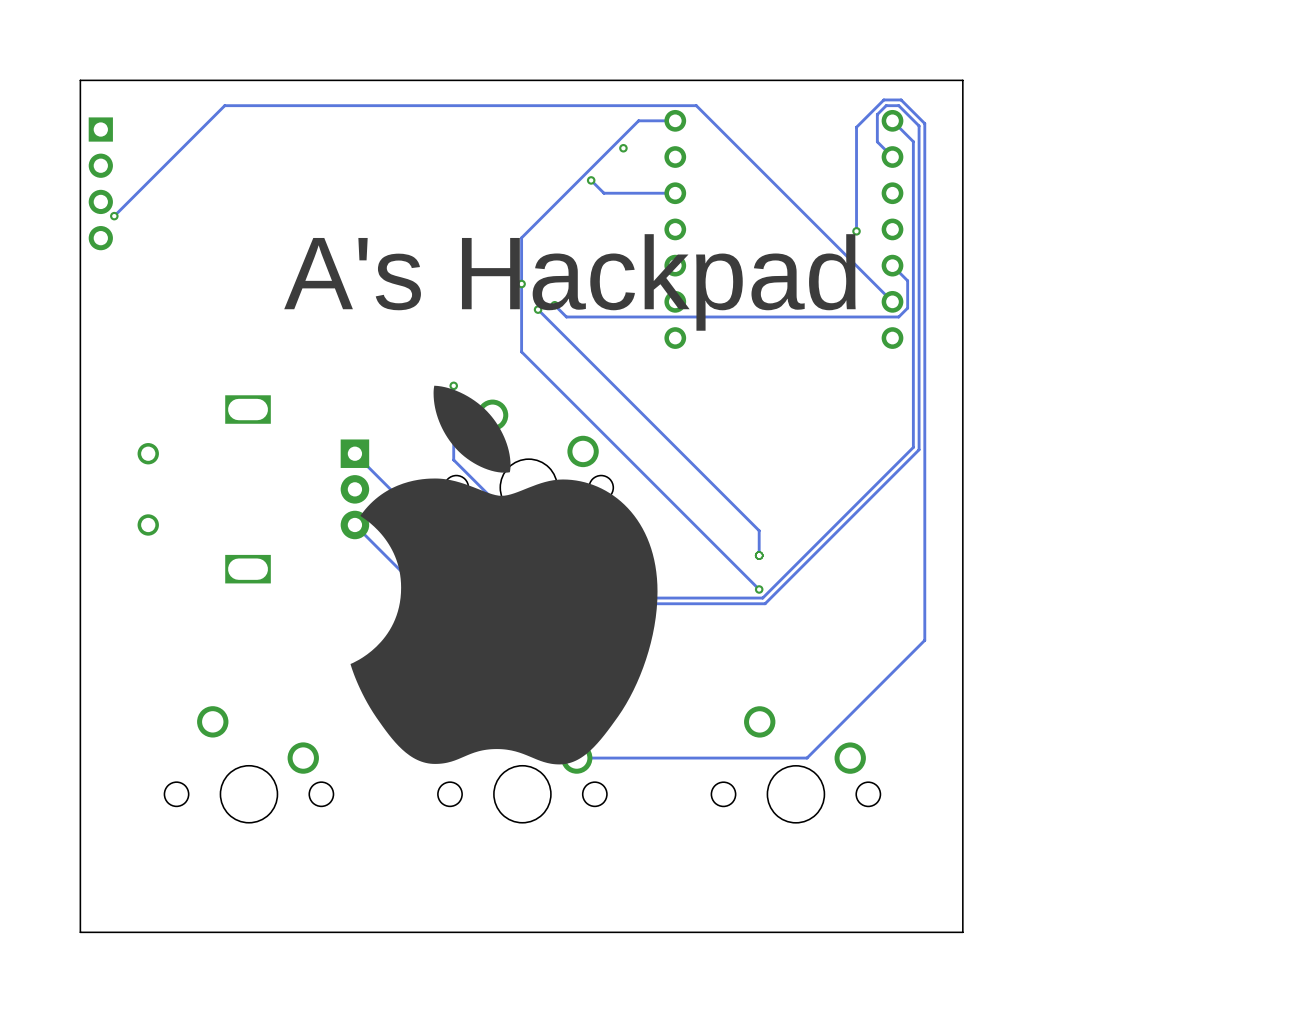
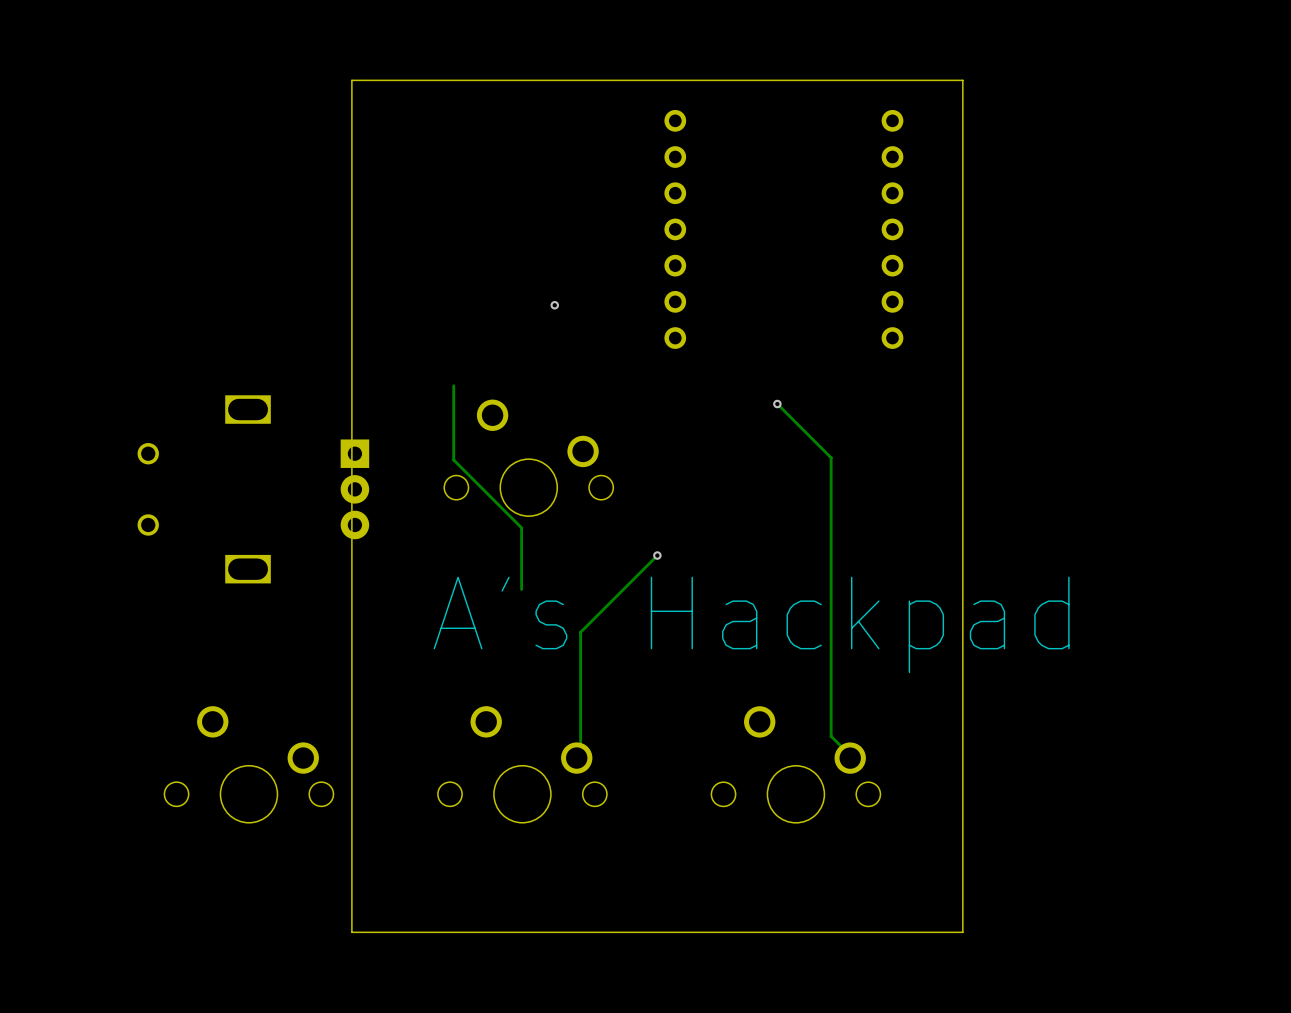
board edge: (351, 80) (80, 80) (80, 932) (351, 932) -> (351, 80) (351, 932)
track: (675, 120) (638, 120) (521, 237) (521, 351) (759, 589) -> none
track: (892, 120) (913, 141) (913, 447) (762, 598) (499, 598) (354, 453) -> none
via: (623, 148) -> none
track: (892, 157) (877, 141) (877, 114) (886, 105) (898, 105) (919, 125) (919, 449) (765, 603) (433, 603) (354, 524) -> none
track: (591, 180) (603, 193) (675, 193) -> none
via: (591, 180) -> none
part: (100, 183) -> none
track: (114, 216) (224, 105) (696, 105) (892, 301) -> none
via: (114, 216) -> none
track: (856, 230) (856, 127) (883, 99) (901, 99) (924, 123) (924, 640) (807, 758) (576, 758) -> none
via: (856, 231) -> none
track: (892, 265) (907, 280) (907, 308) (898, 316) (566, 316) (554, 305) -> none
text: A's Hackpad (569, 282) -> none
via: (521, 284) -> none
track: (538, 309) (759, 530) (759, 555) -> none
via: (538, 309) -> none
drawing: [350, 385, 658, 765] -> none
via: (453, 385) -> none
track: none -> (777, 404) (831, 457) (831, 736) (852, 757)
via: none -> (777, 404)
track: none -> (657, 555) (580, 632) (580, 756)
via: none -> (657, 555)
via: (759, 555) -> none
via: (759, 589) -> none
text: none -> A's Hackpad (751, 624)

